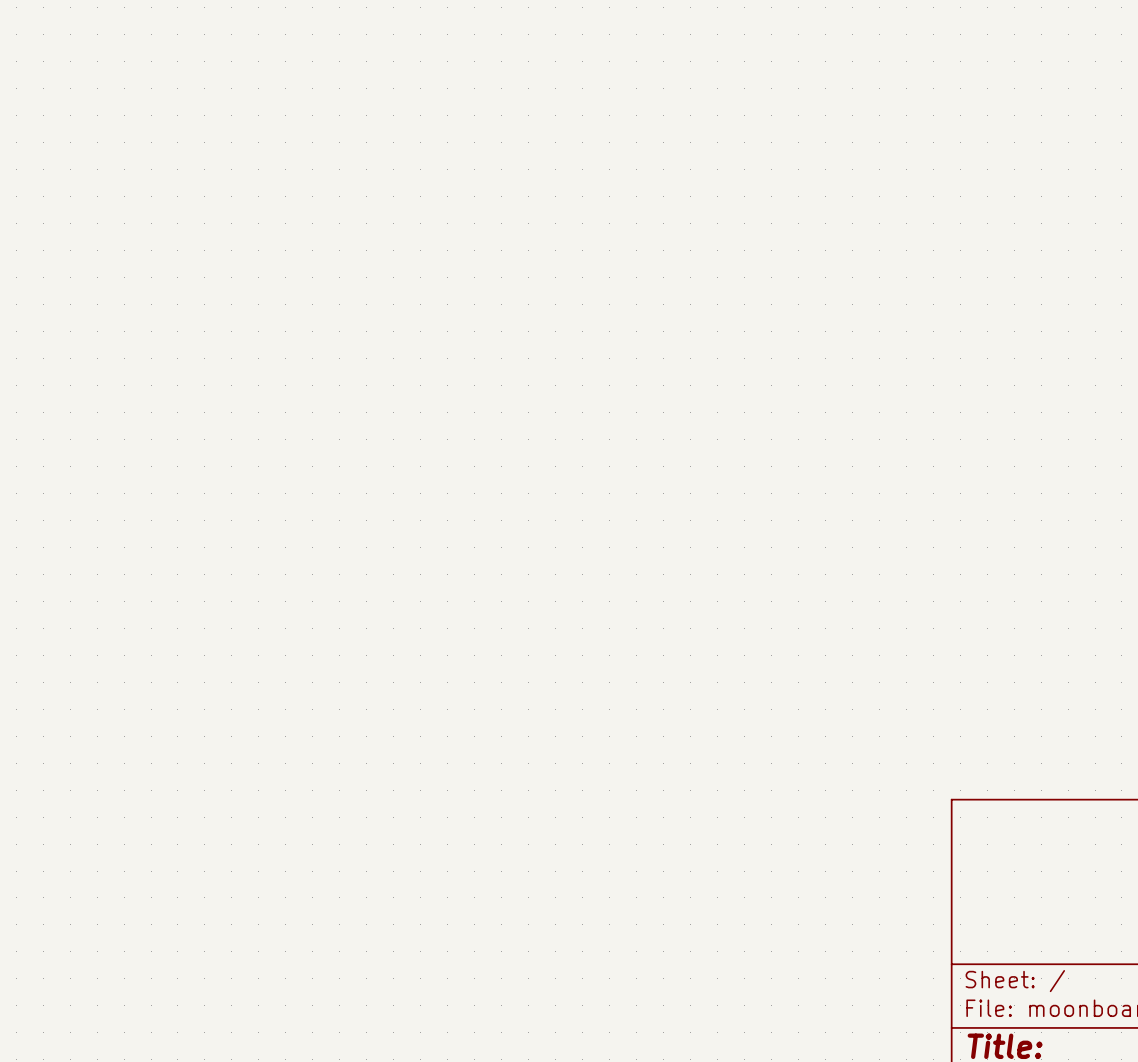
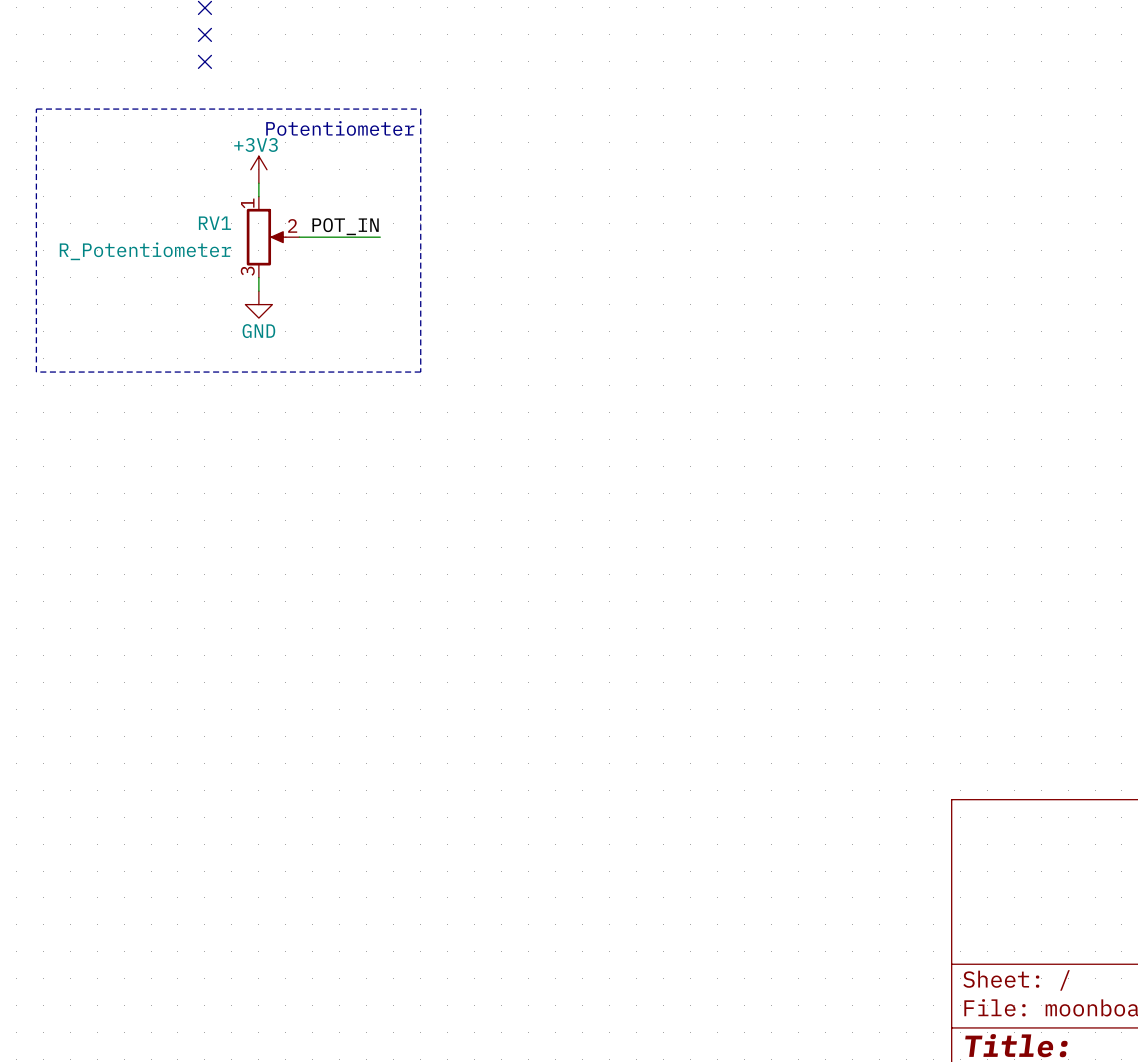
no-connect mark: none -> (204, 7)
no-connect mark: none -> (204, 34)
no-connect mark: none -> (204, 61)
line: none -> (36, 109) (420, 109) (420, 372) (36, 372) (36, 109)
text: none -> Potentiometer (340, 128)
power symbol: none -> +3V3 (258, 169)
wire: none -> (258, 183) (258, 196)
label: none -> POT_IN (345, 226)
RV1: none -> R_Potentiometer (273, 237)
wire: none -> (299, 237) (380, 237)
wire: none -> (258, 277) (258, 291)
power symbol: none -> GND (258, 304)

